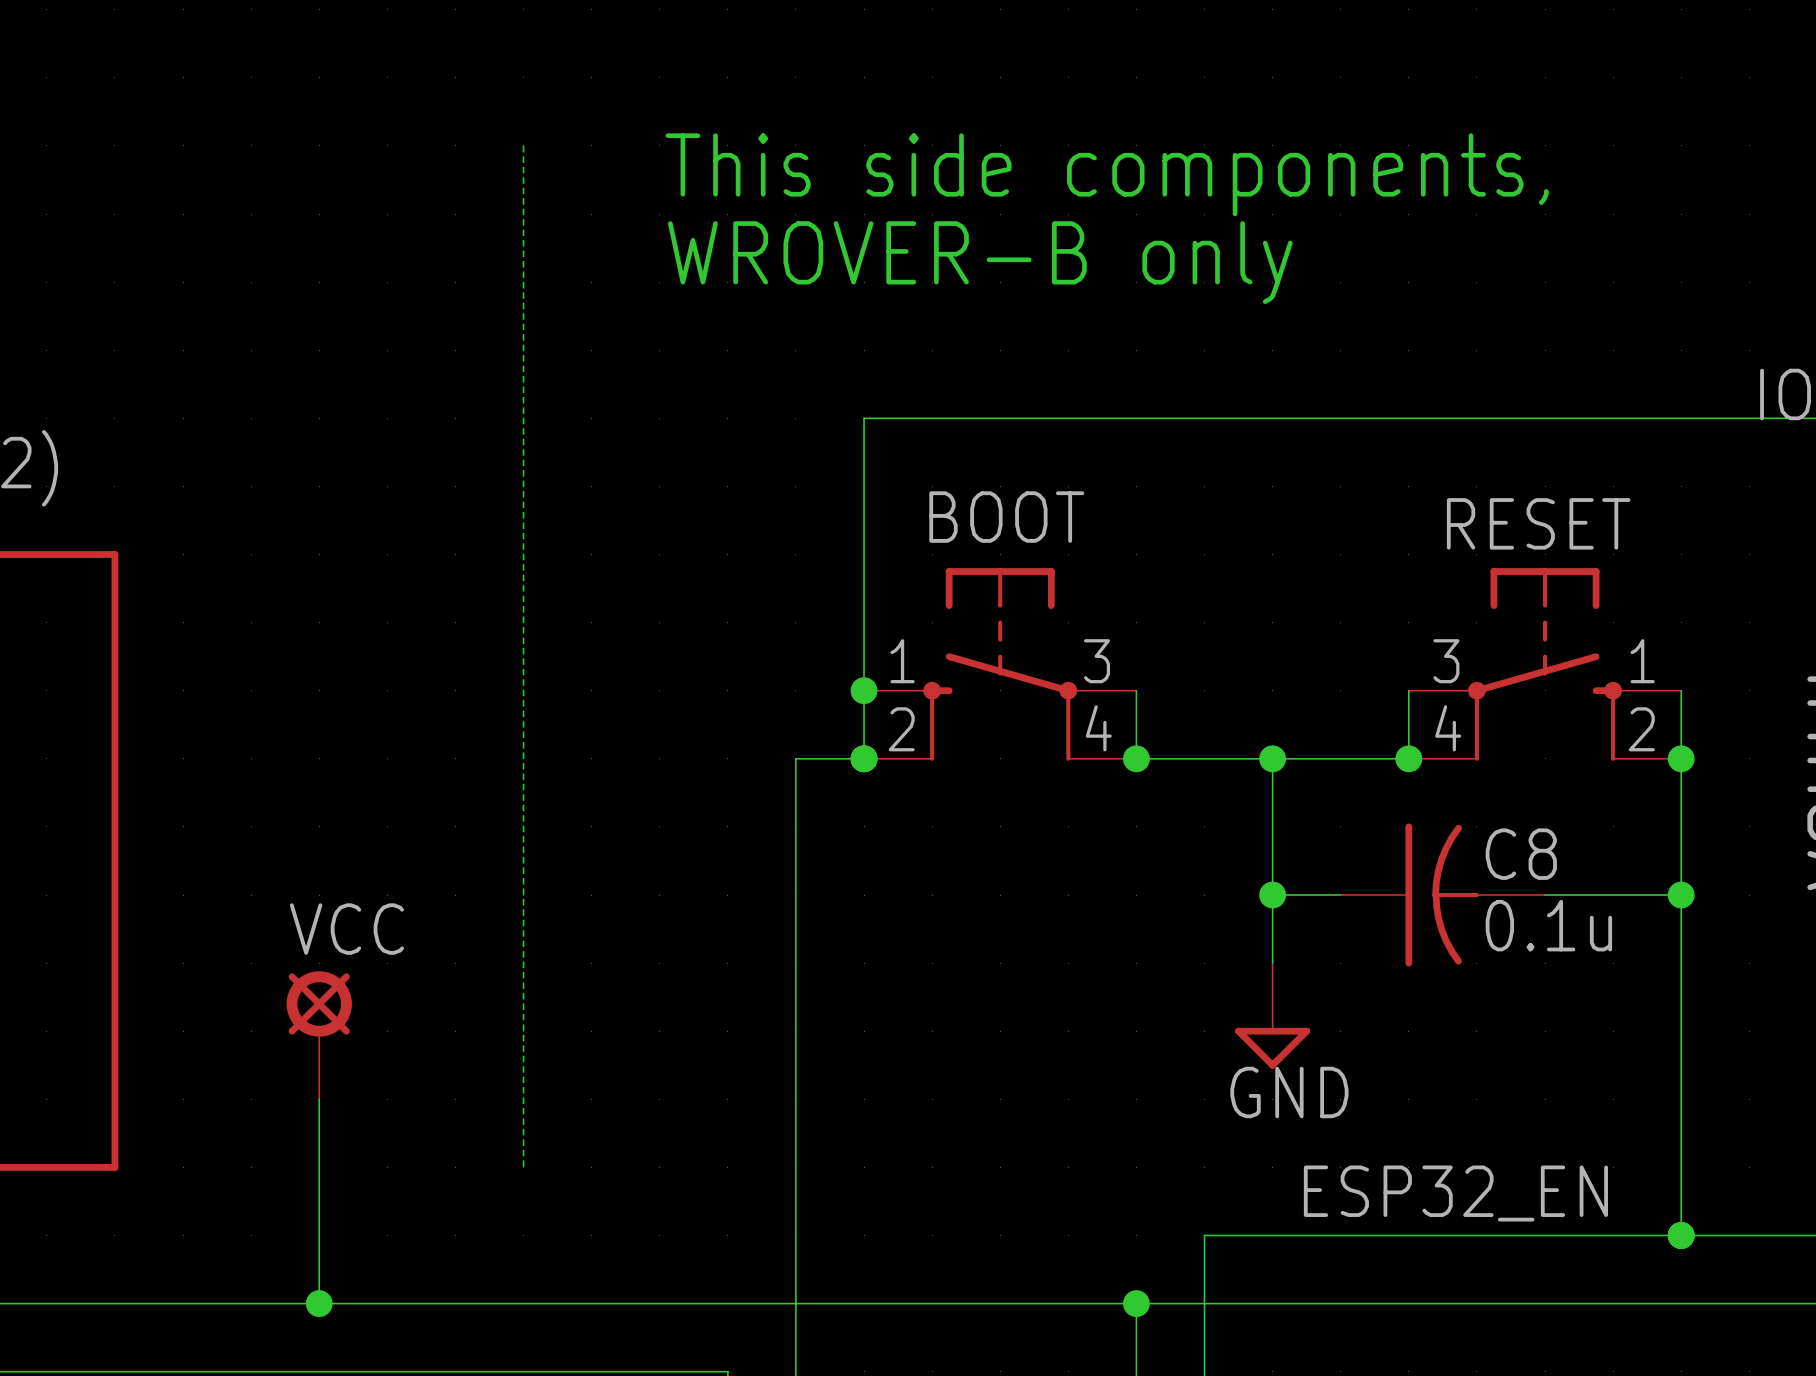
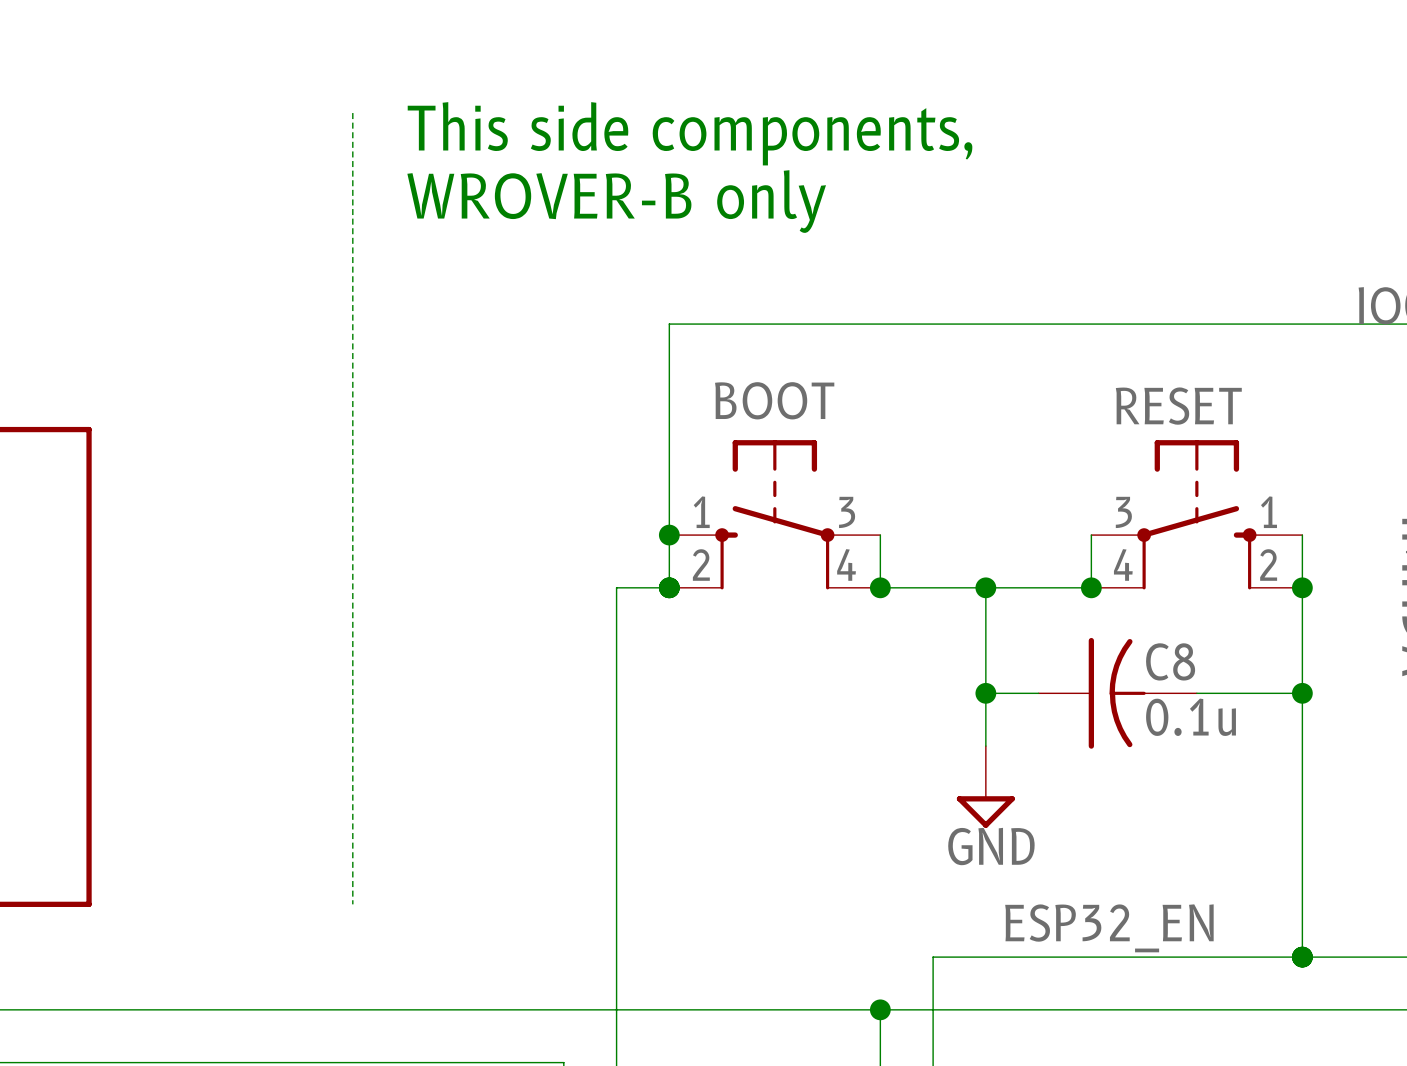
wire: (523, 145) (523, 1167) -> (352, 113) (352, 904)
text position: This side components, (1107, 174) -> This side components, (690, 133)
text position: WROVER-B only (980, 262) -> WROVER-B only (616, 201)
VCC: (319, 1035) -> none
wire: (319, 1099) (319, 1303) -> none
junction: (319, 1303) -> none

